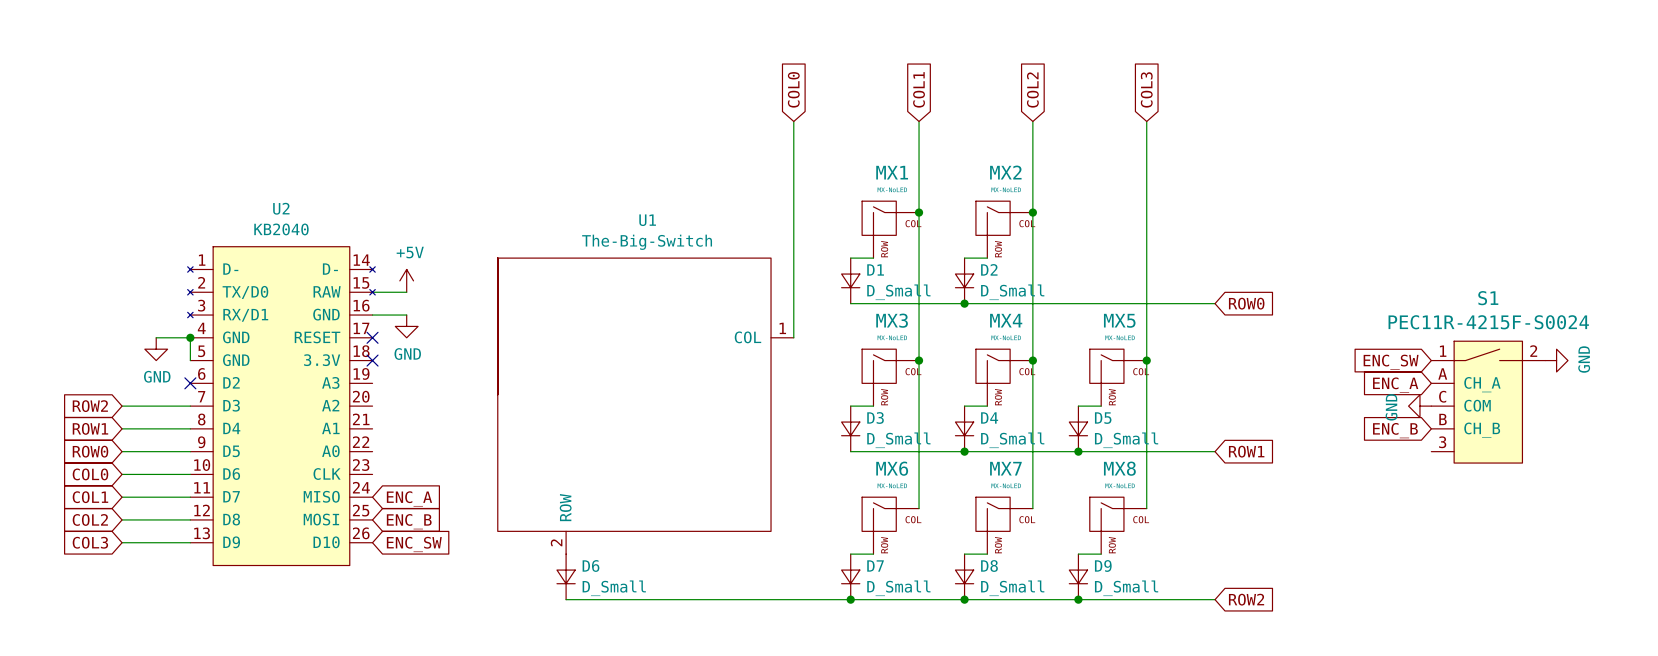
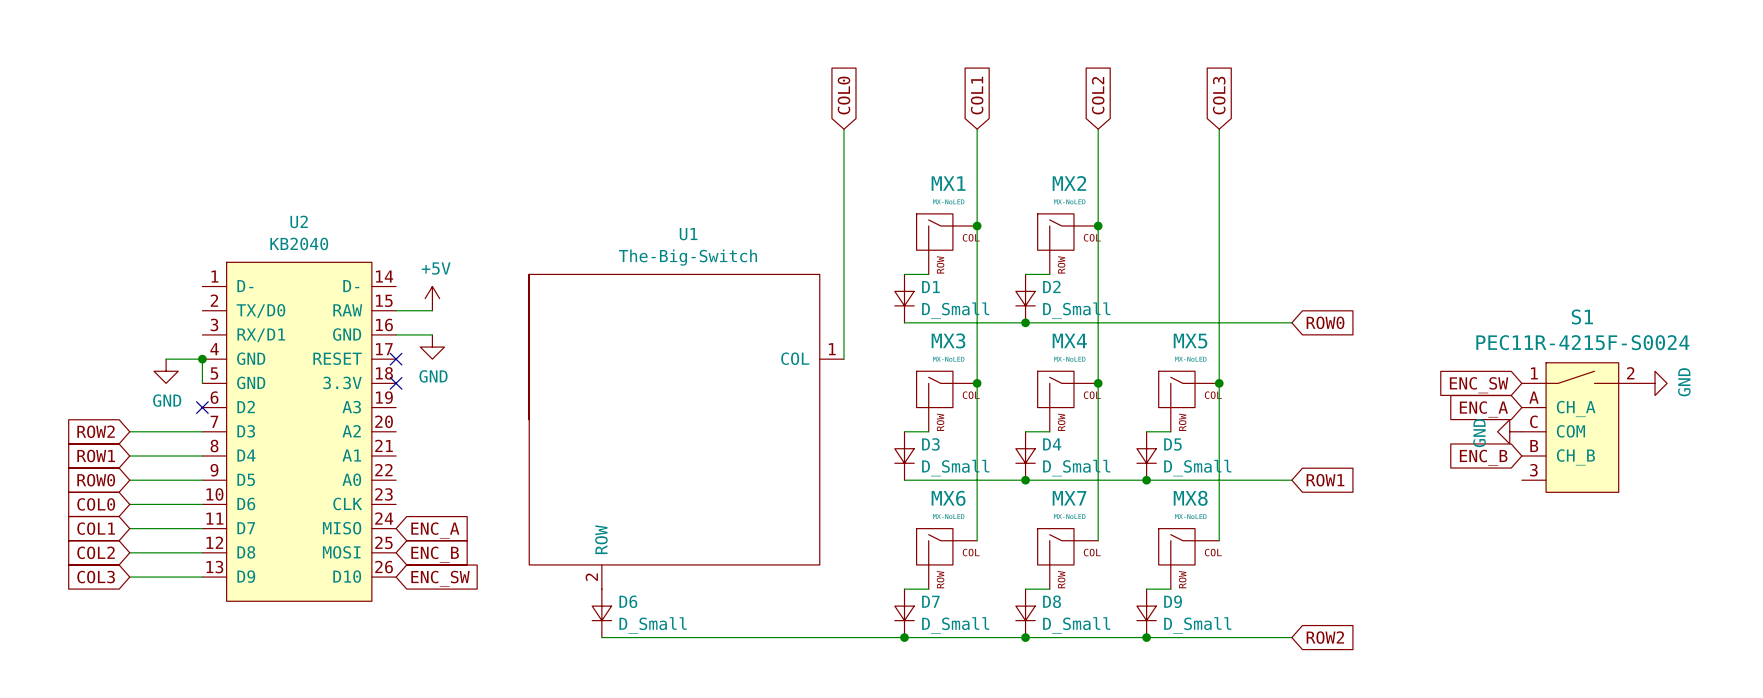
U2 symbol: [187, 246, 376, 566] -> [202, 262, 397, 602]

